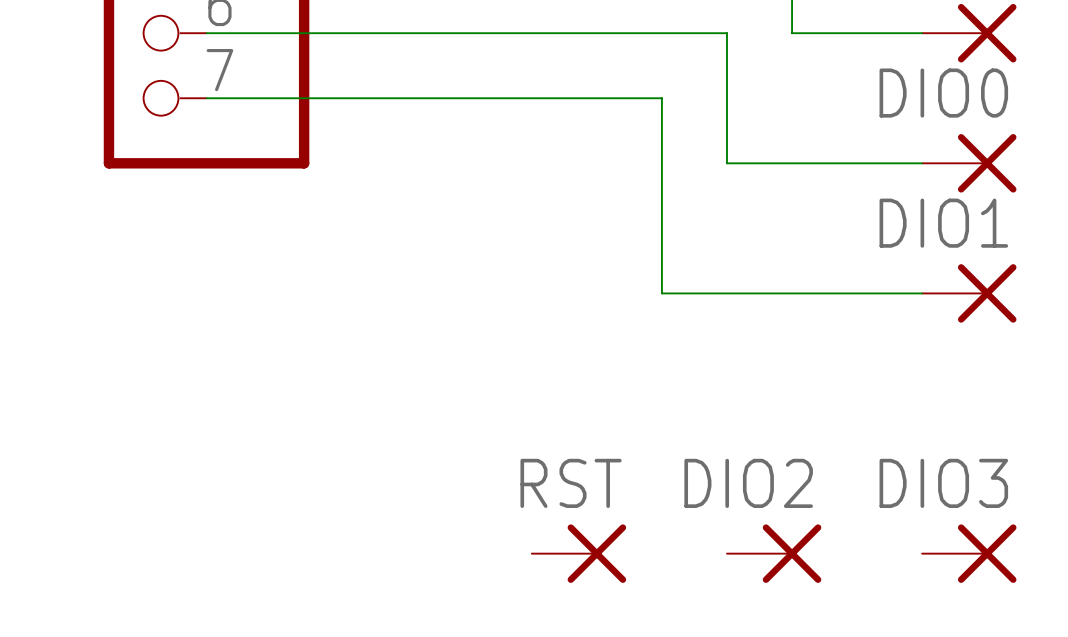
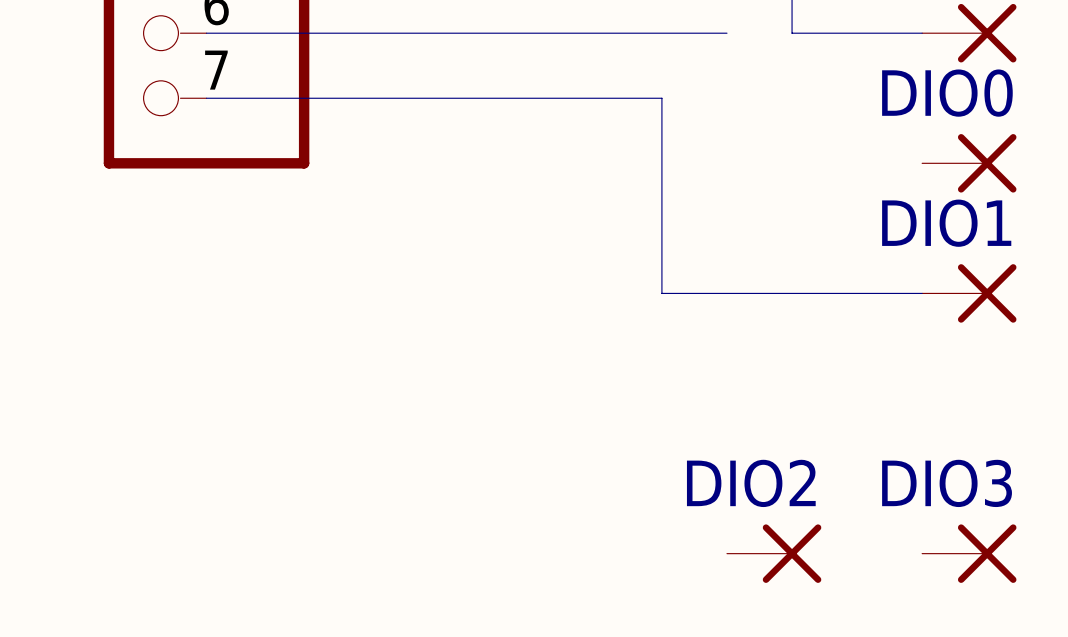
wire: (726, 33) (726, 163) (922, 163) -> none
RST: (578, 553) -> none

